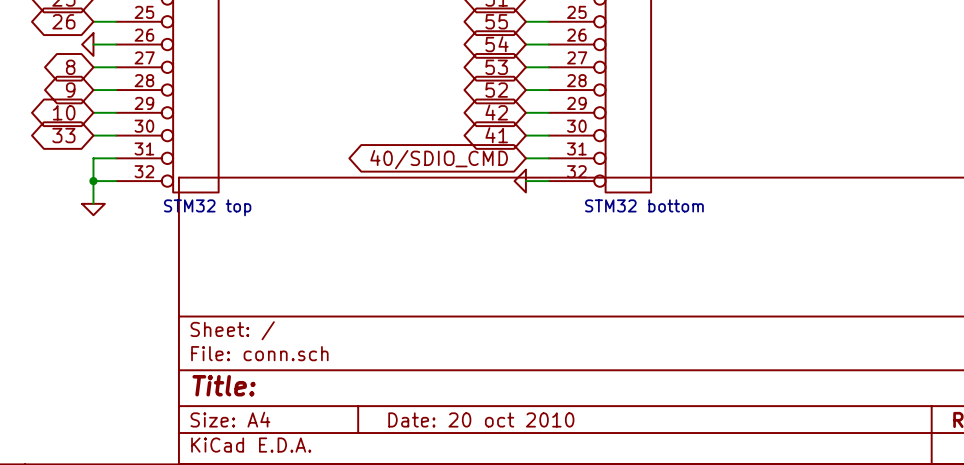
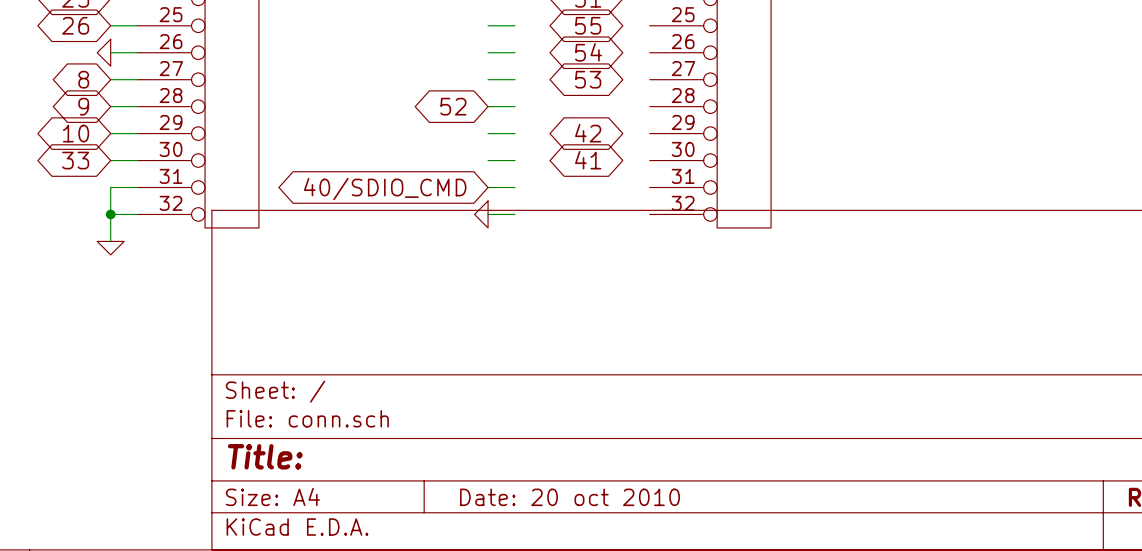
wire: (525, 21) (548, 21) -> (488, 25) (515, 25)
wire: (525, 44) (548, 44) -> (488, 52) (515, 52)
wire: (525, 67) (548, 67) -> (488, 79) (515, 79)
global label position: 52 (496, 90) -> 52 (453, 106)
wire: (525, 90) (548, 90) -> (488, 106) (515, 106)
wire: (525, 112) (548, 112) -> (488, 133) (515, 133)
wire: (525, 135) (548, 135) -> (488, 160) (515, 160)
wire: (525, 158) (548, 158) -> (488, 187) (515, 187)
global label position: 40/SDIO_CMD (439, 159) -> 40/SDIO_CMD (385, 189)
power symbol position: (520, 181) -> (481, 214)
wire: (525, 181) (548, 181) -> (488, 214) (515, 214)
text: STM32 bottom (644, 205) -> none
text: STM32 top (207, 207) -> none

